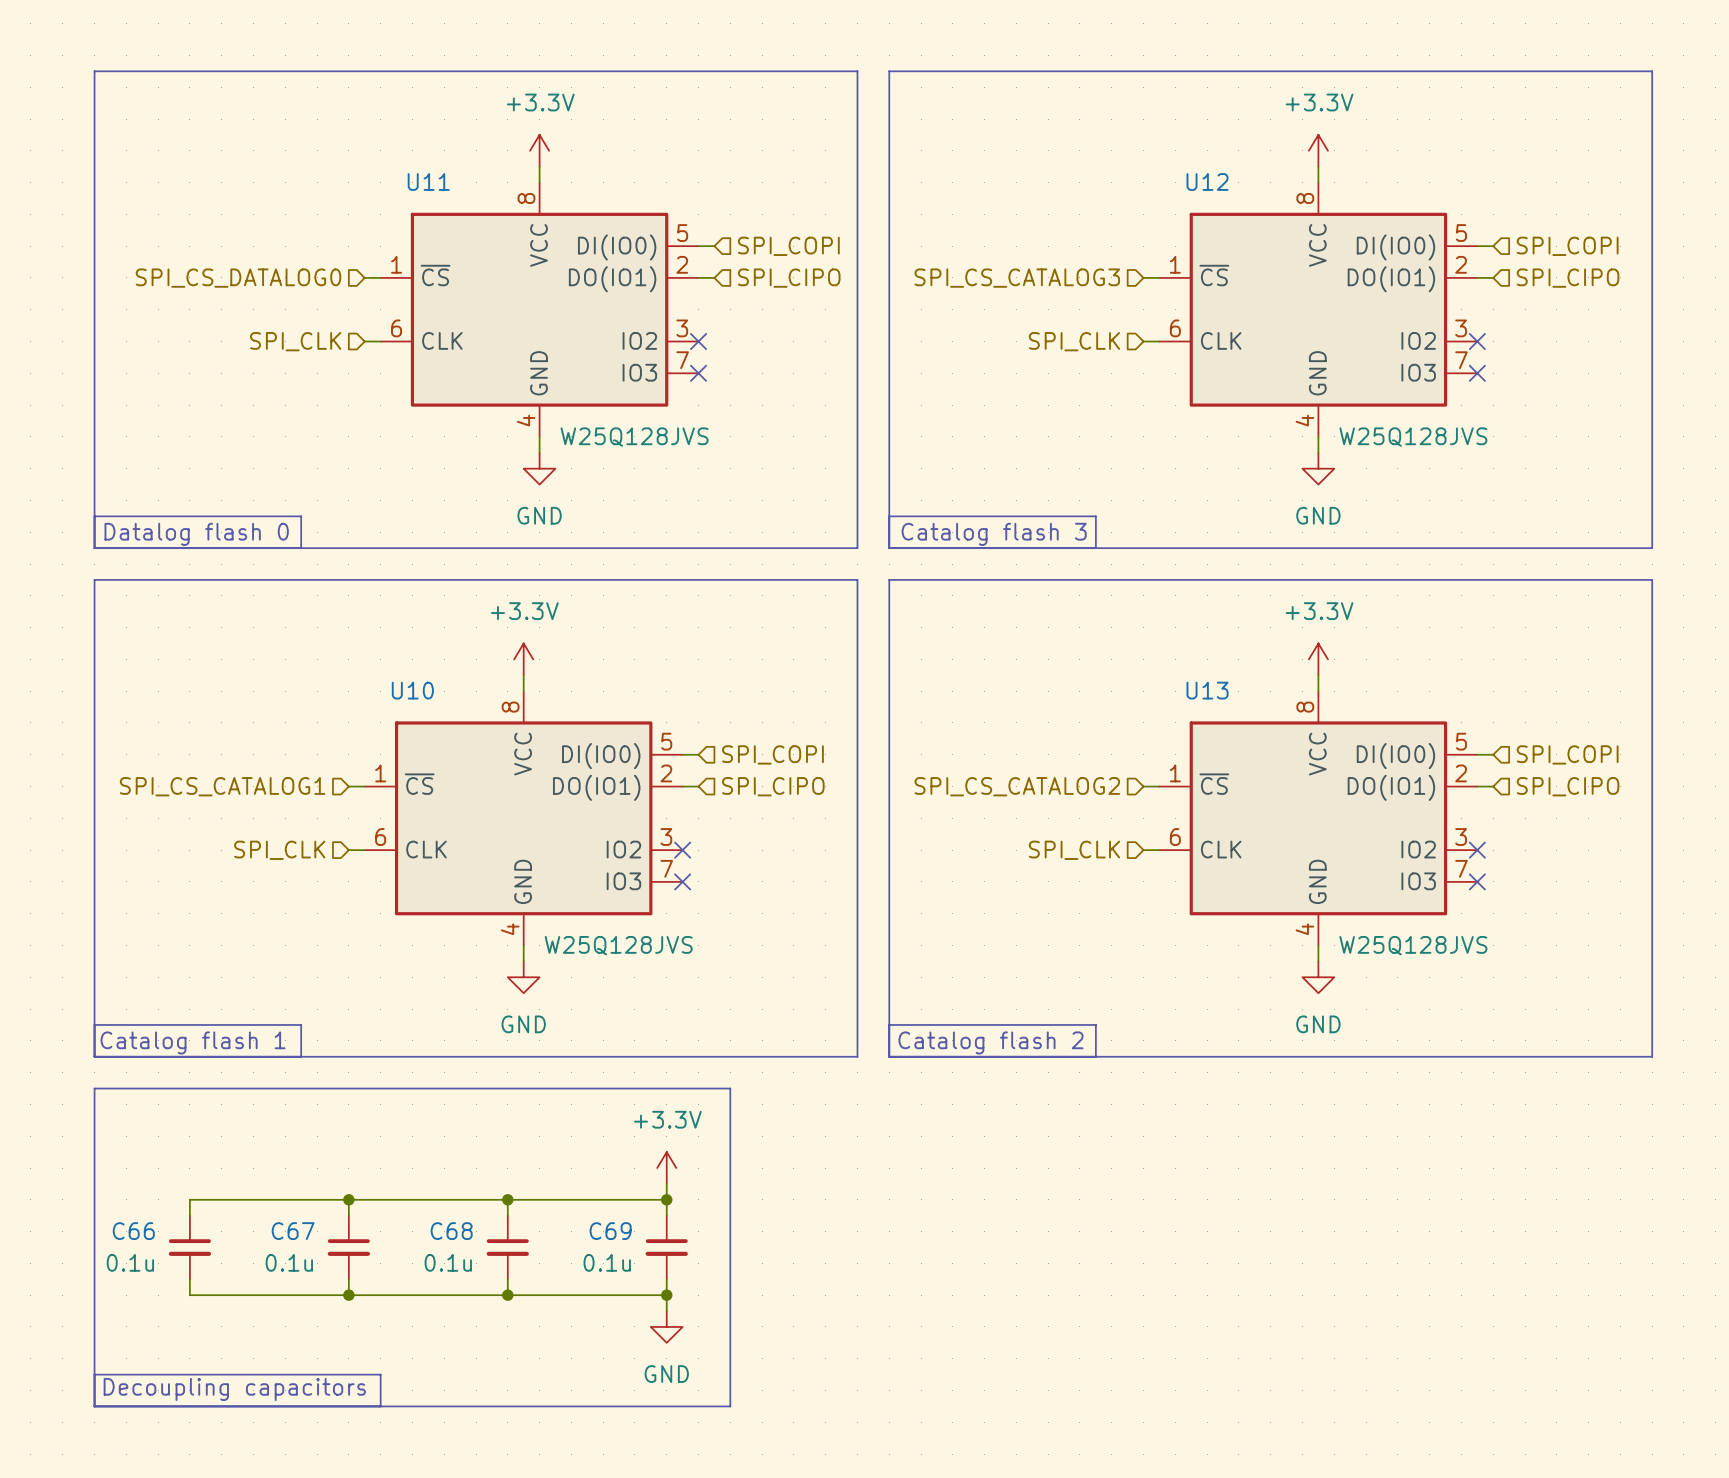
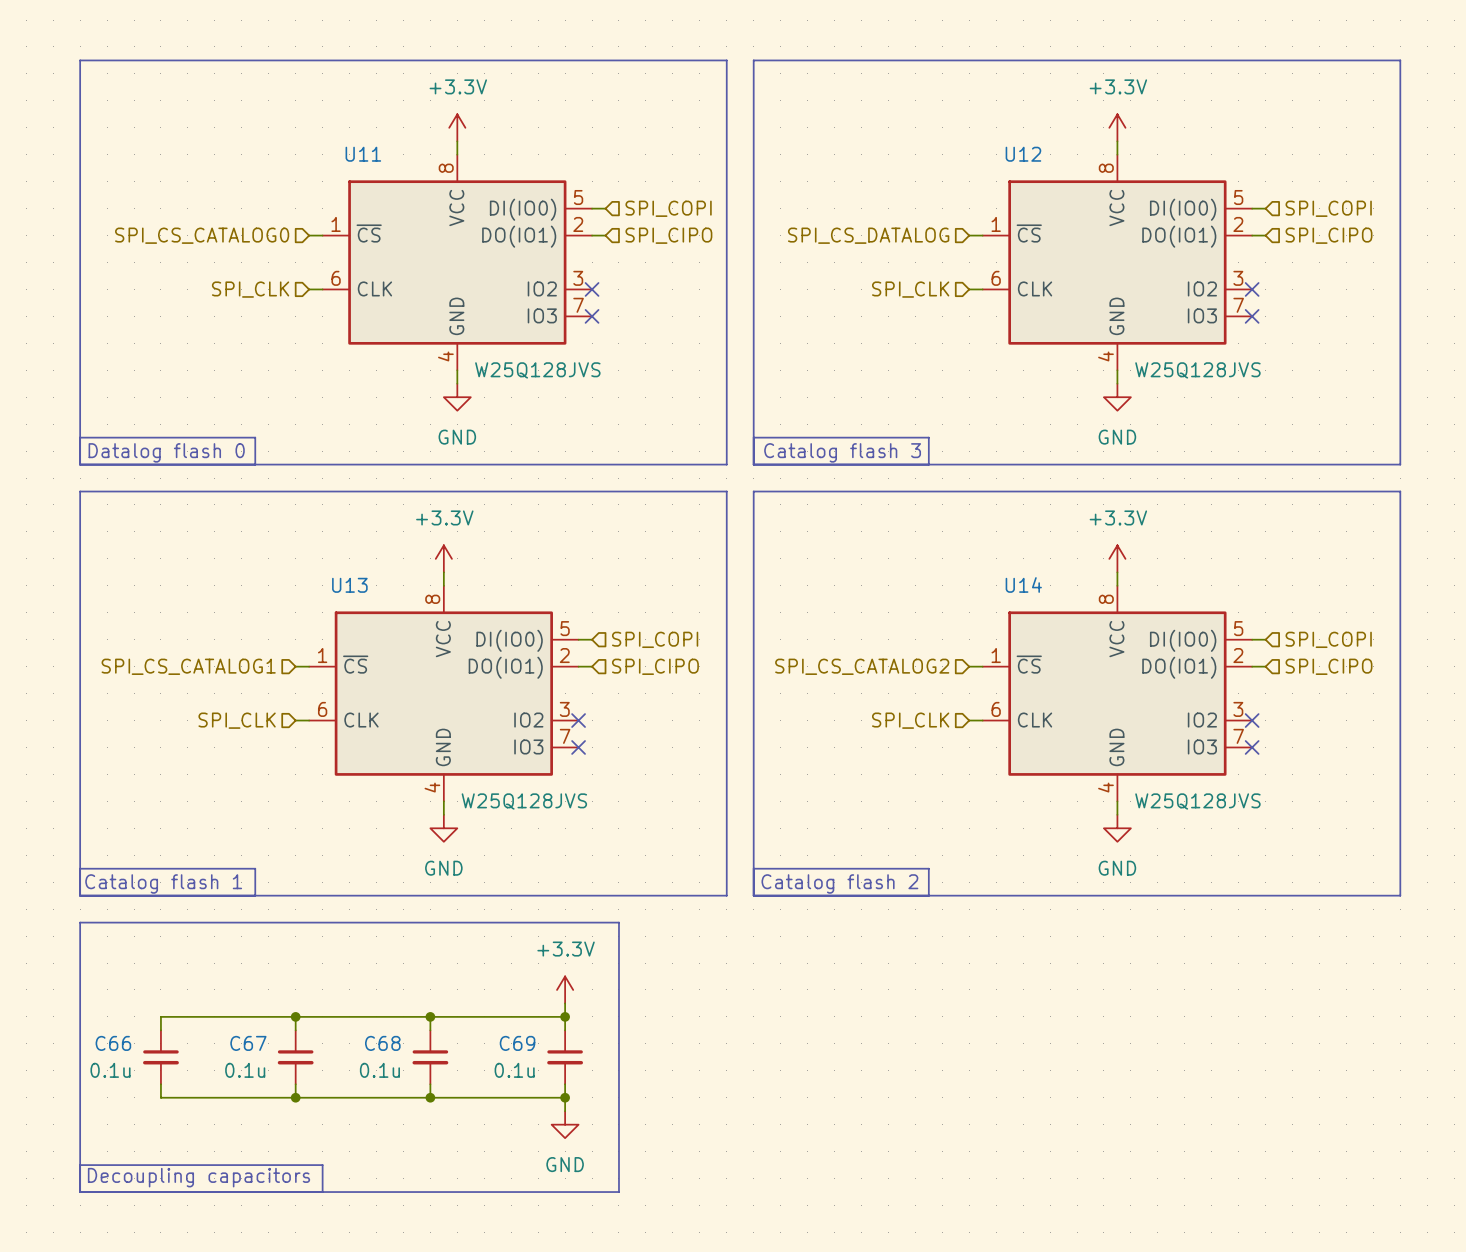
hierarchical label: SPI_CS_DATALOG0 (238, 278) -> SPI_CS_CATALOG0 (202, 235)
hierarchical label: SPI_CS_CATALOG3 (1017, 278) -> SPI_CS_DATALOG (868, 235)
U10 name: U10 (412, 690) -> U13 (349, 585)
U13 name: U13 (1207, 690) -> U14 (1023, 584)

